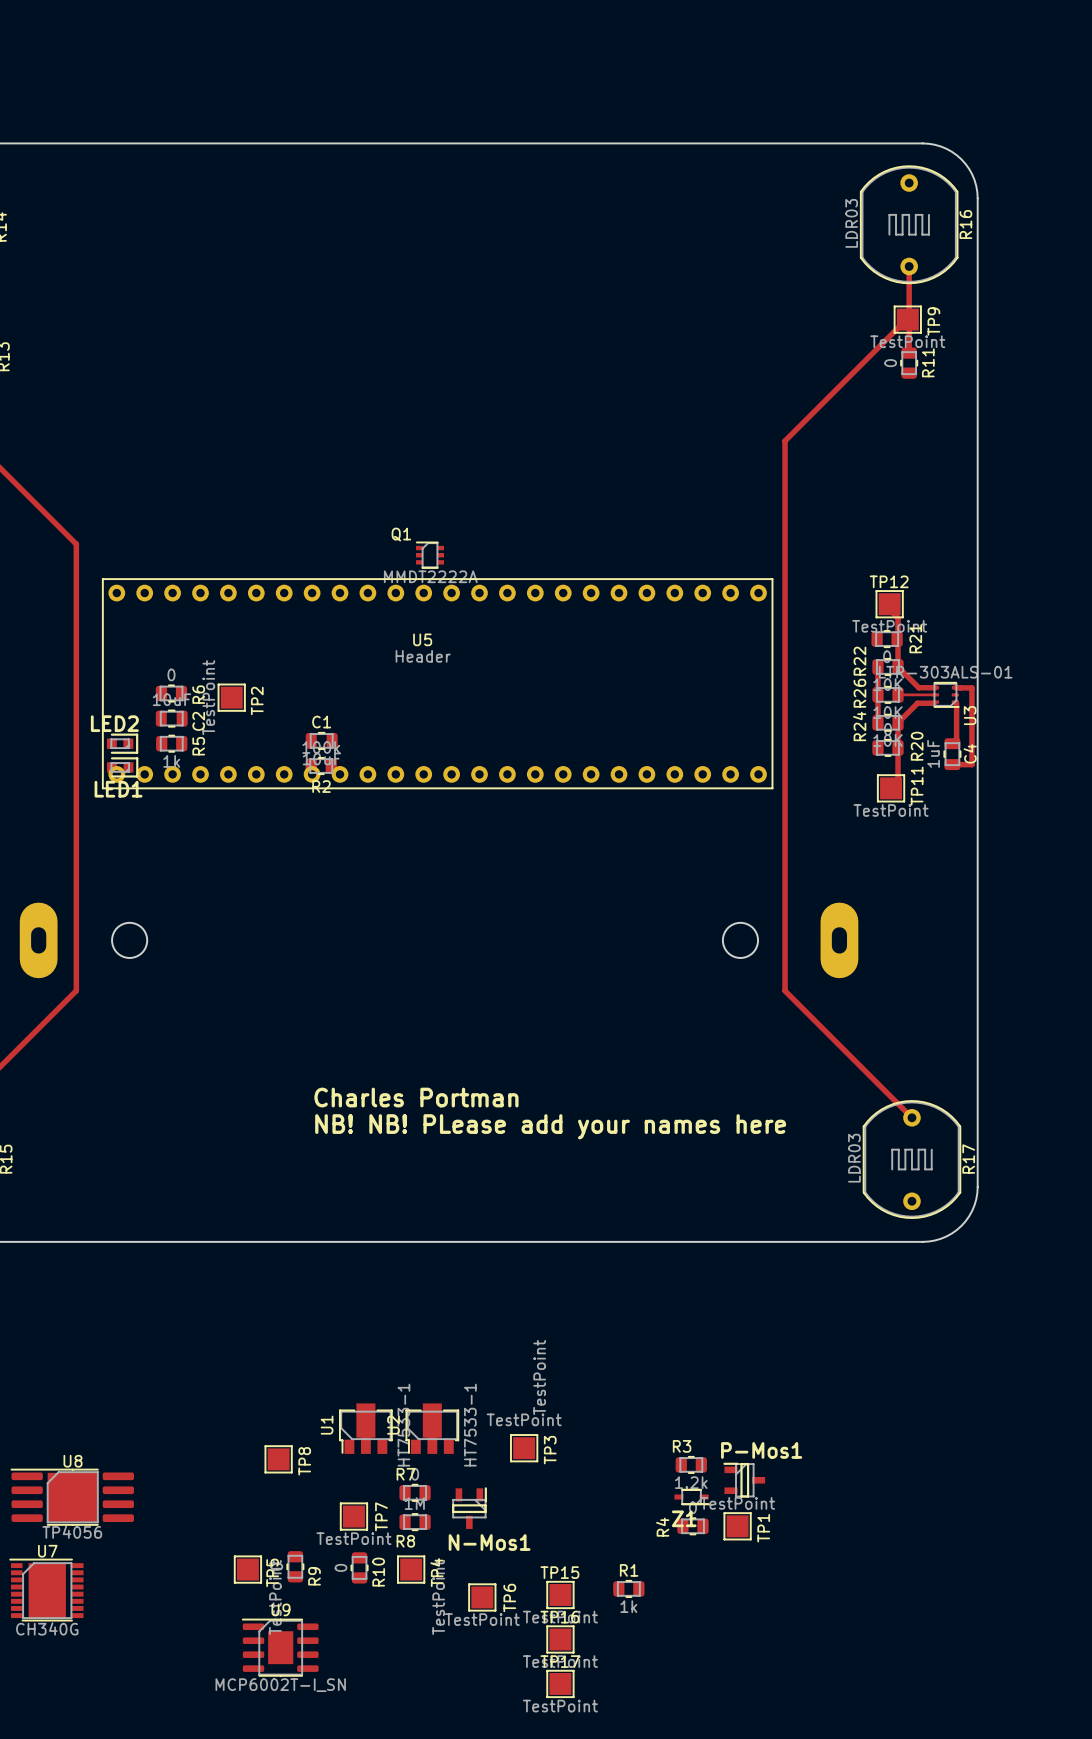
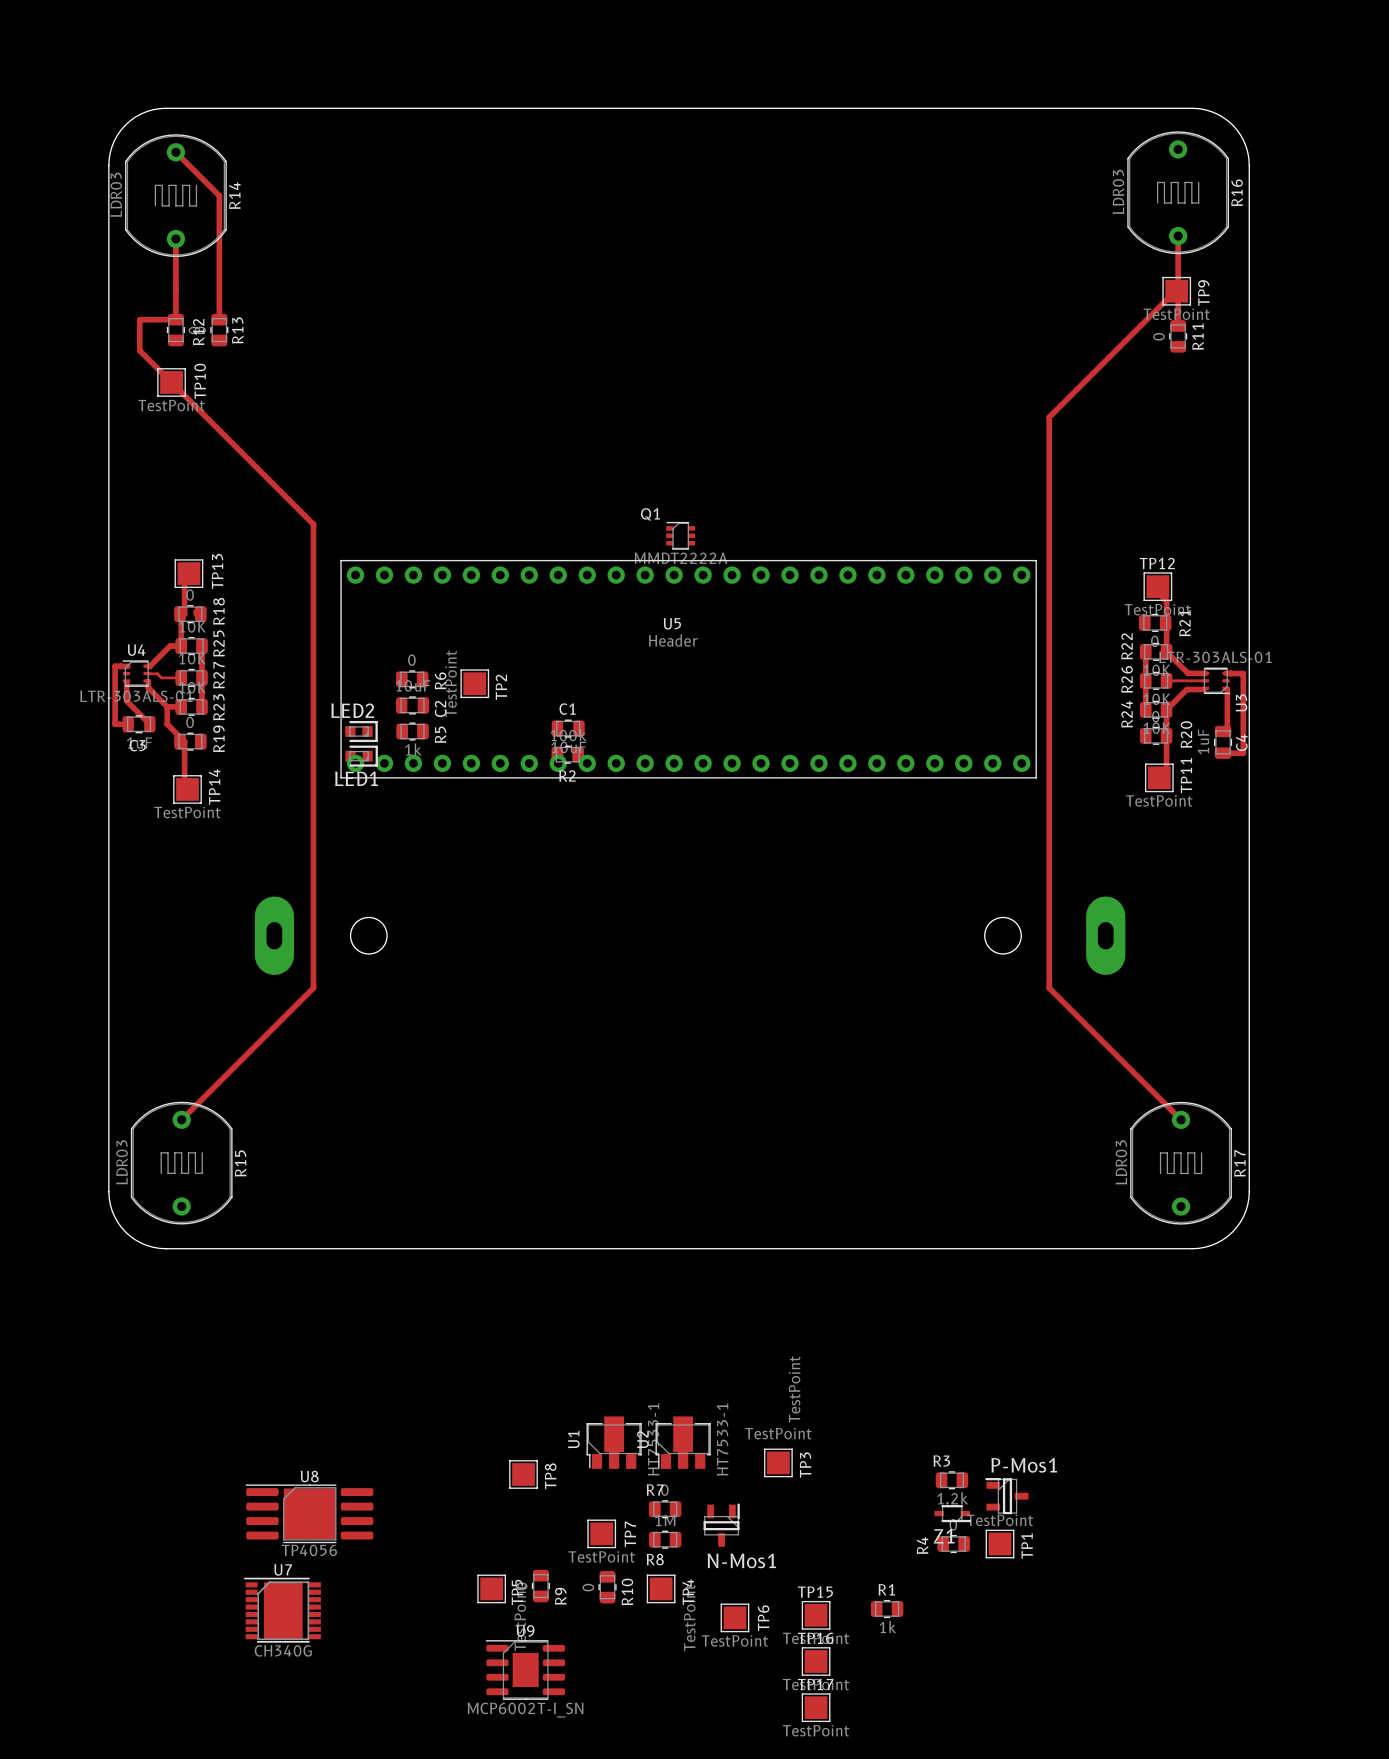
text: Charles Portman (416, 1097) -> none
text: NB! NB! PLease add your names here (550, 1126) -> none

